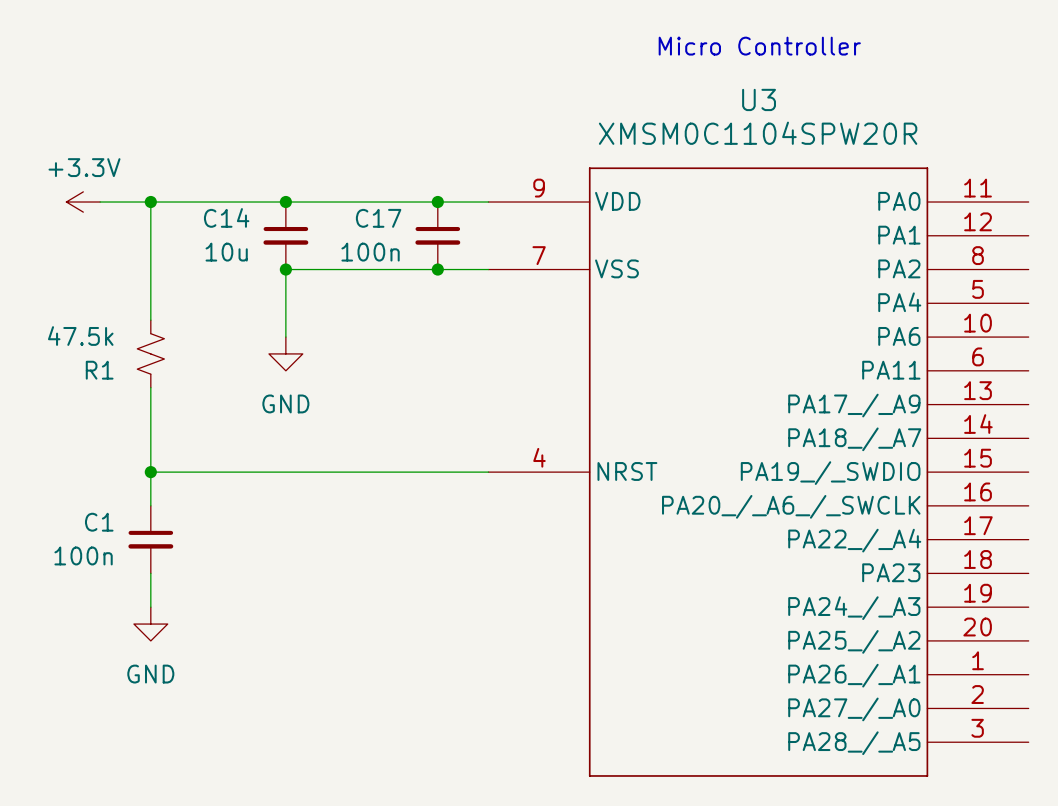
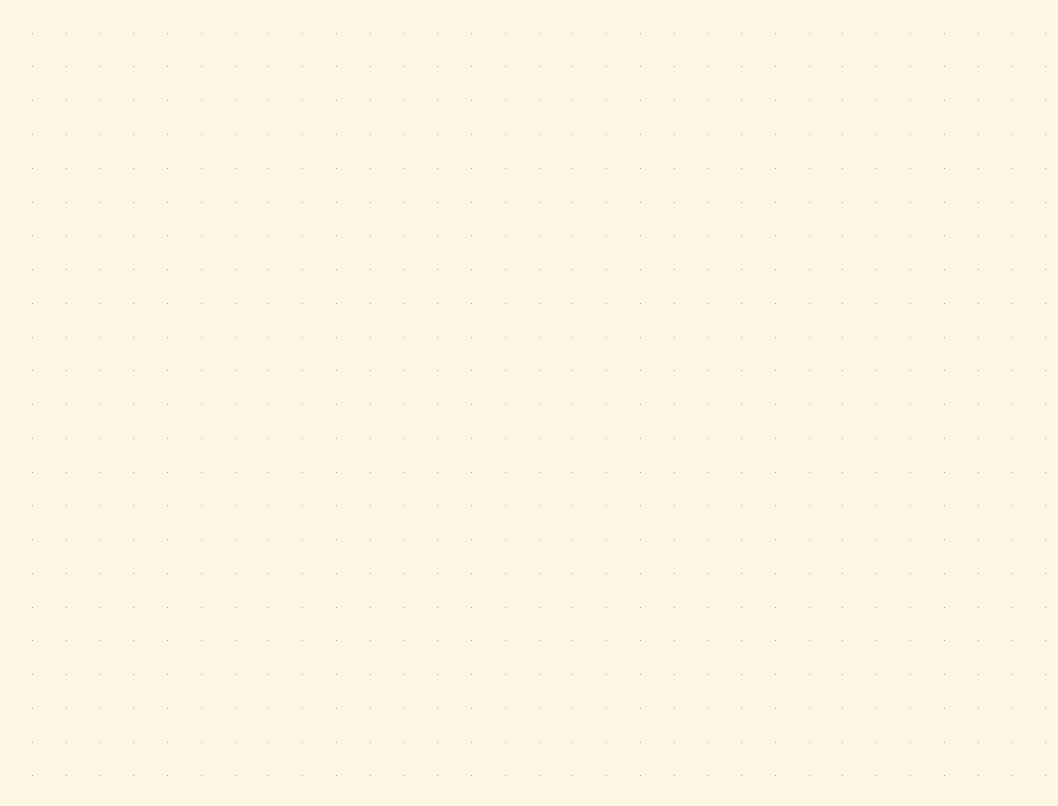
text: Micro Controller (759, 46) -> none
power symbol: +3.3V (83, 202) -> none
wire: (100, 202) (488, 202) -> none
wire: (150, 202) (150, 320) -> none
junction: (150, 202) -> none
junction: (285, 202) -> none
junction: (437, 202) -> none
C14: 10u (285, 235) -> none
C17: 100n (437, 235) -> none
junction: (285, 269) -> none
junction: (437, 269) -> none
wire: (488, 269) (285, 269) (285, 337) -> none
R1: 47.5k (150, 353) -> none
power symbol: GND (285, 353) -> none
wire: (150, 387) (150, 505) -> none
wire: (150, 472) (488, 472) -> none
junction: (150, 472) -> none
U3: XMSM0C1104SPW20R (758, 472) -> none
C1: 100n (150, 539) -> none
wire: (150, 573) (150, 607) -> none
power symbol: GND (150, 624) -> none

